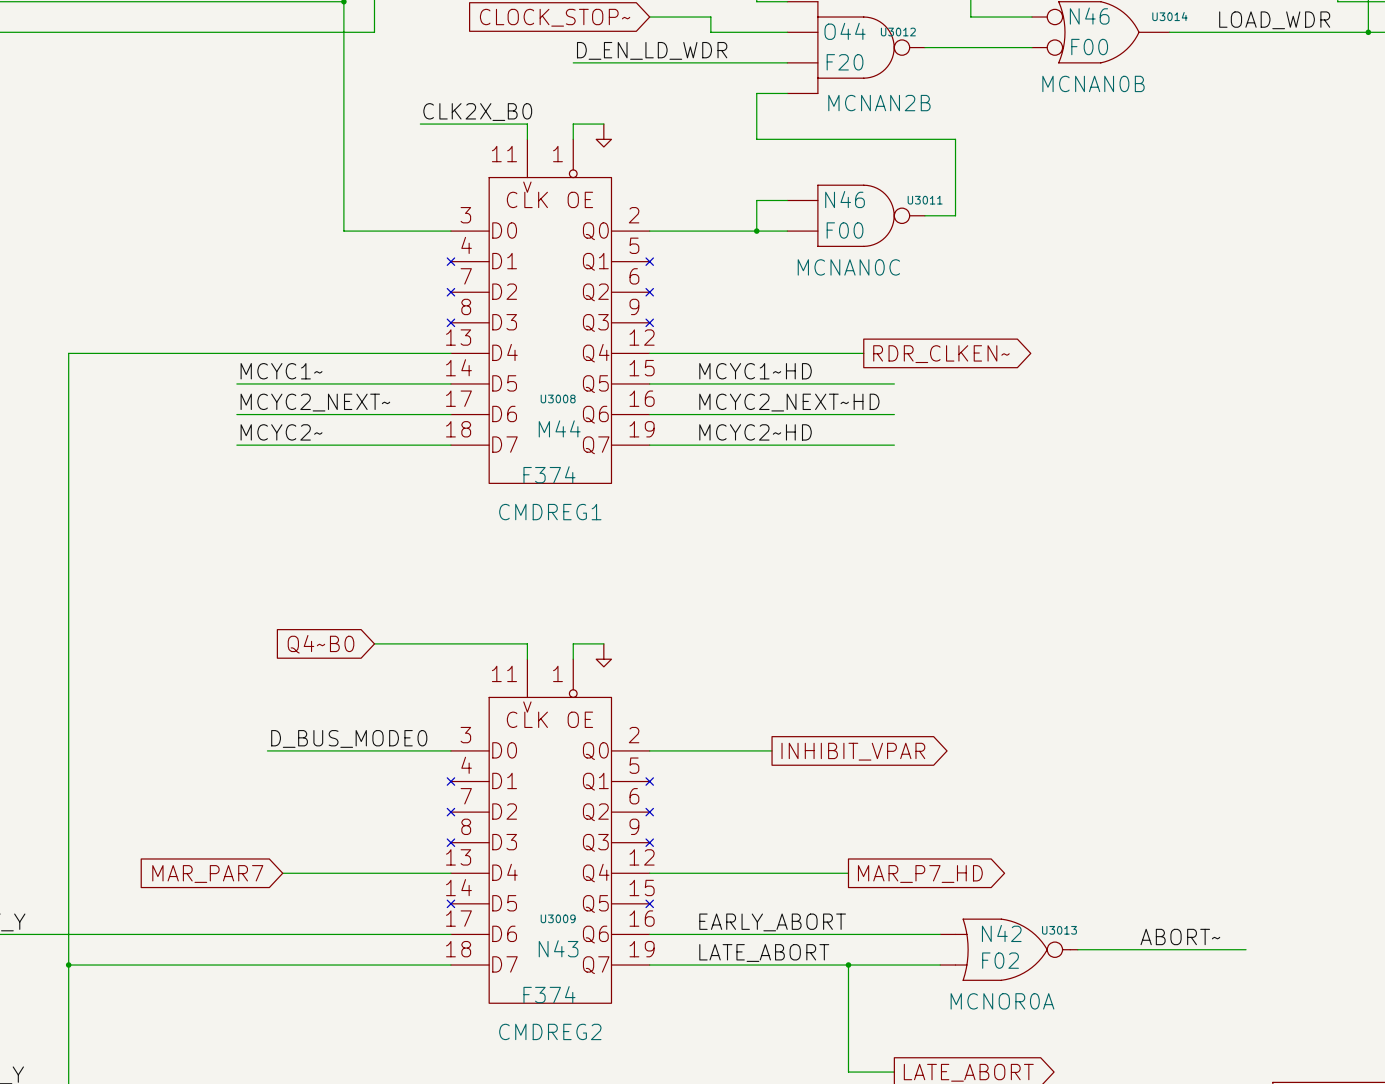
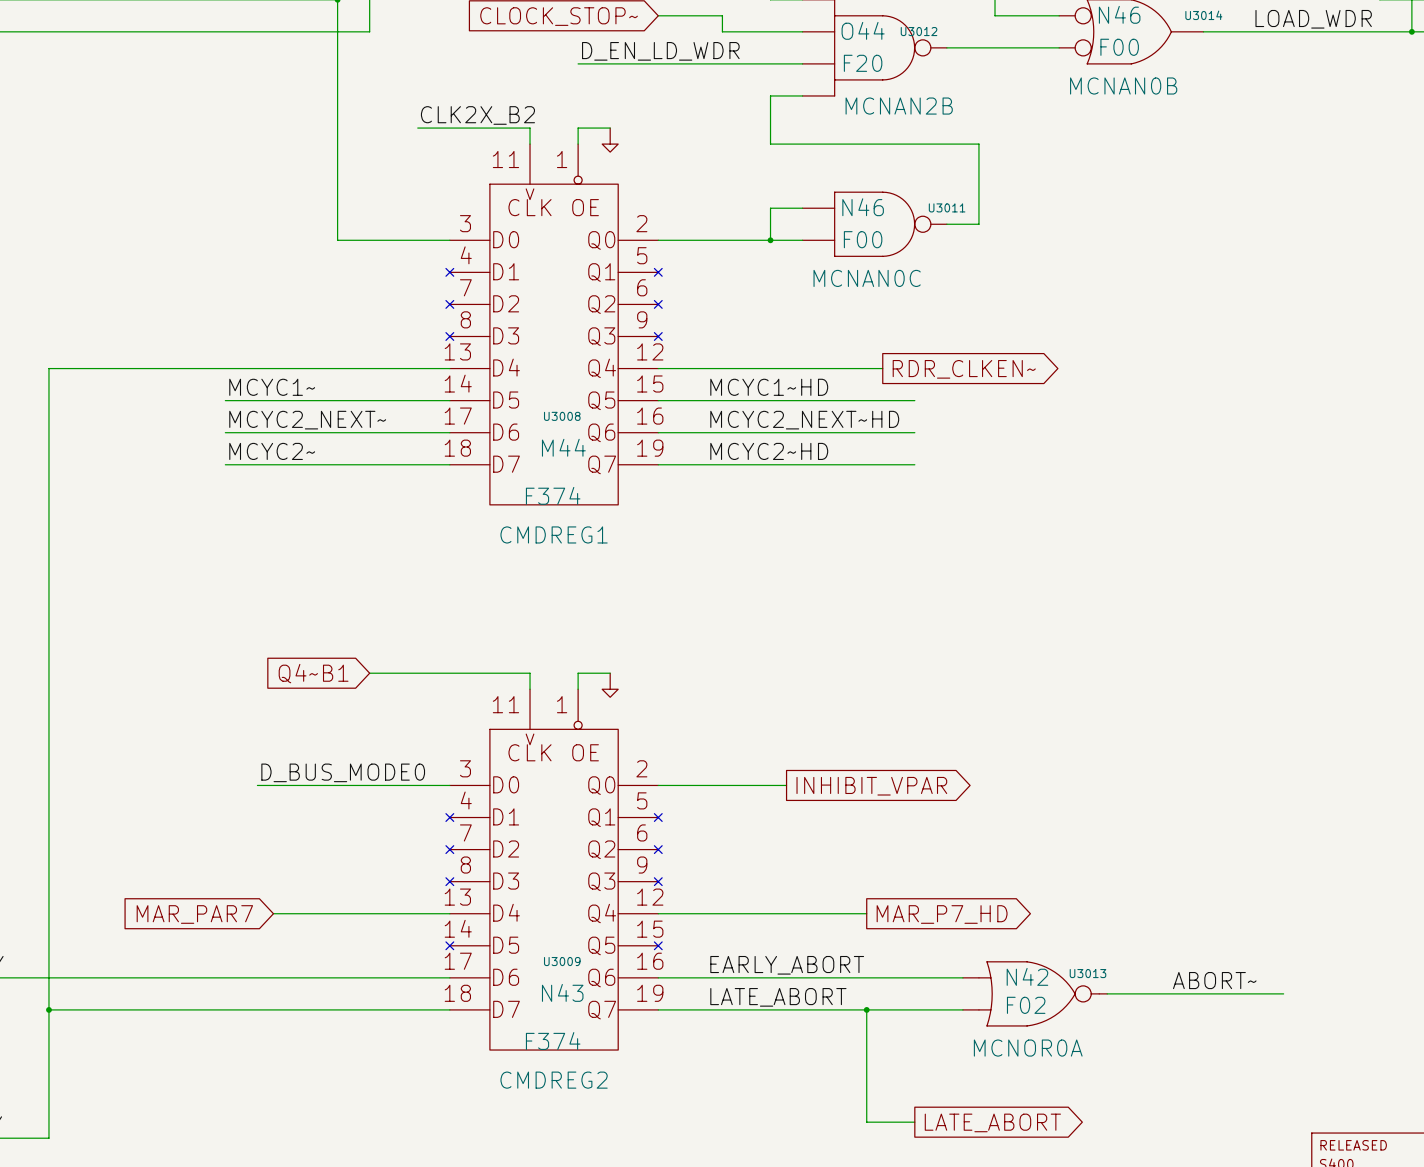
label: CLK2X_B0 (477, 112) -> CLK2X_B2 (477, 115)
global label: Q4~B0 (321, 644) -> Q4~B1 (313, 673)

